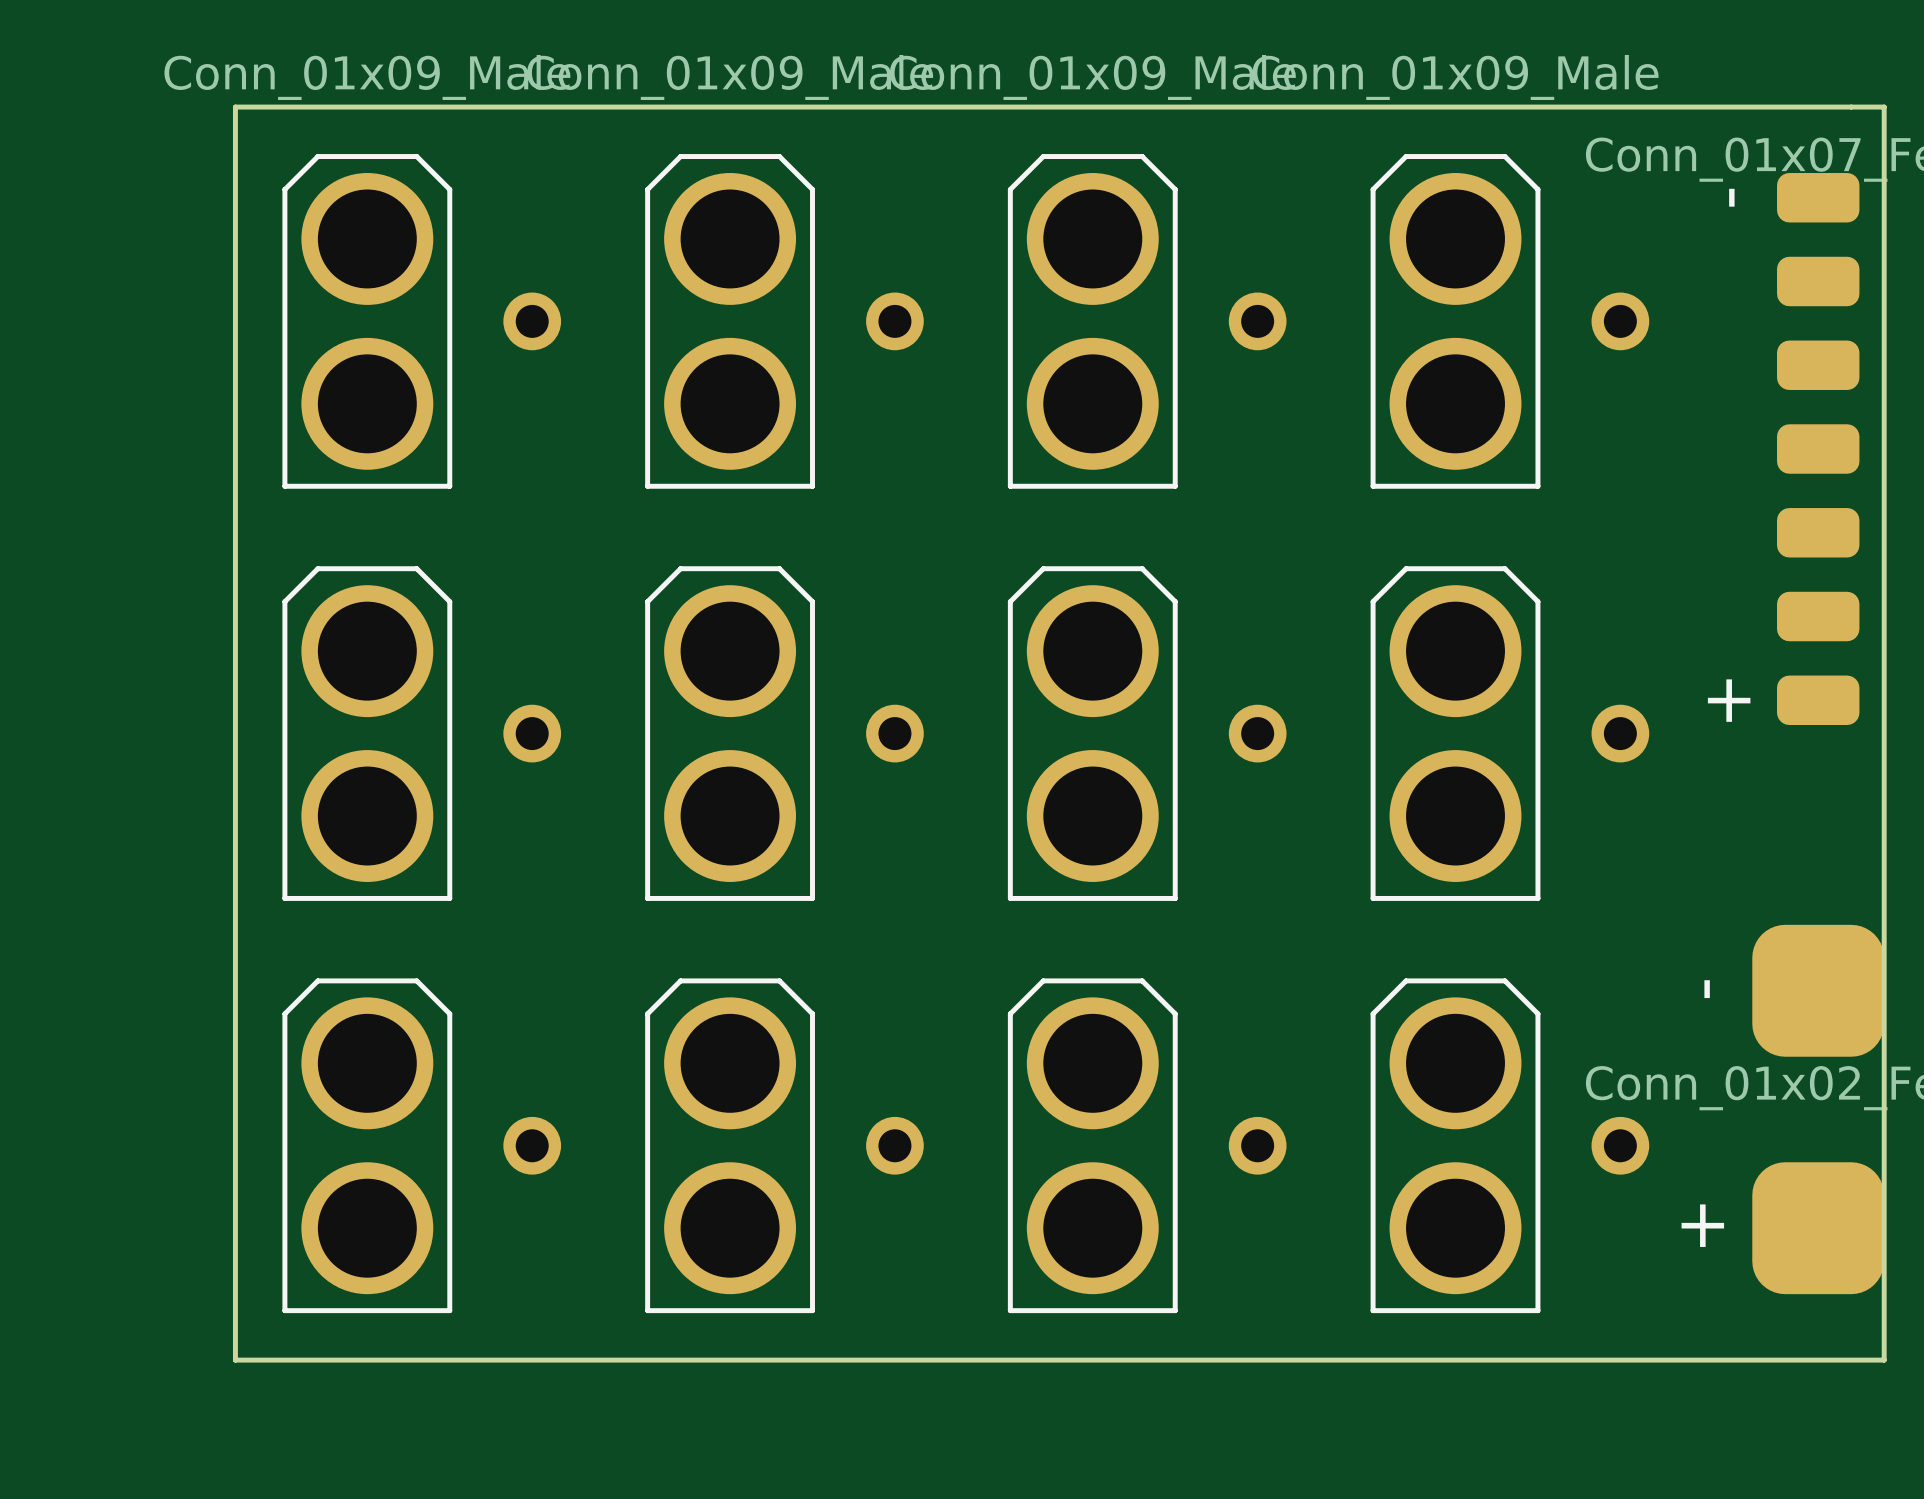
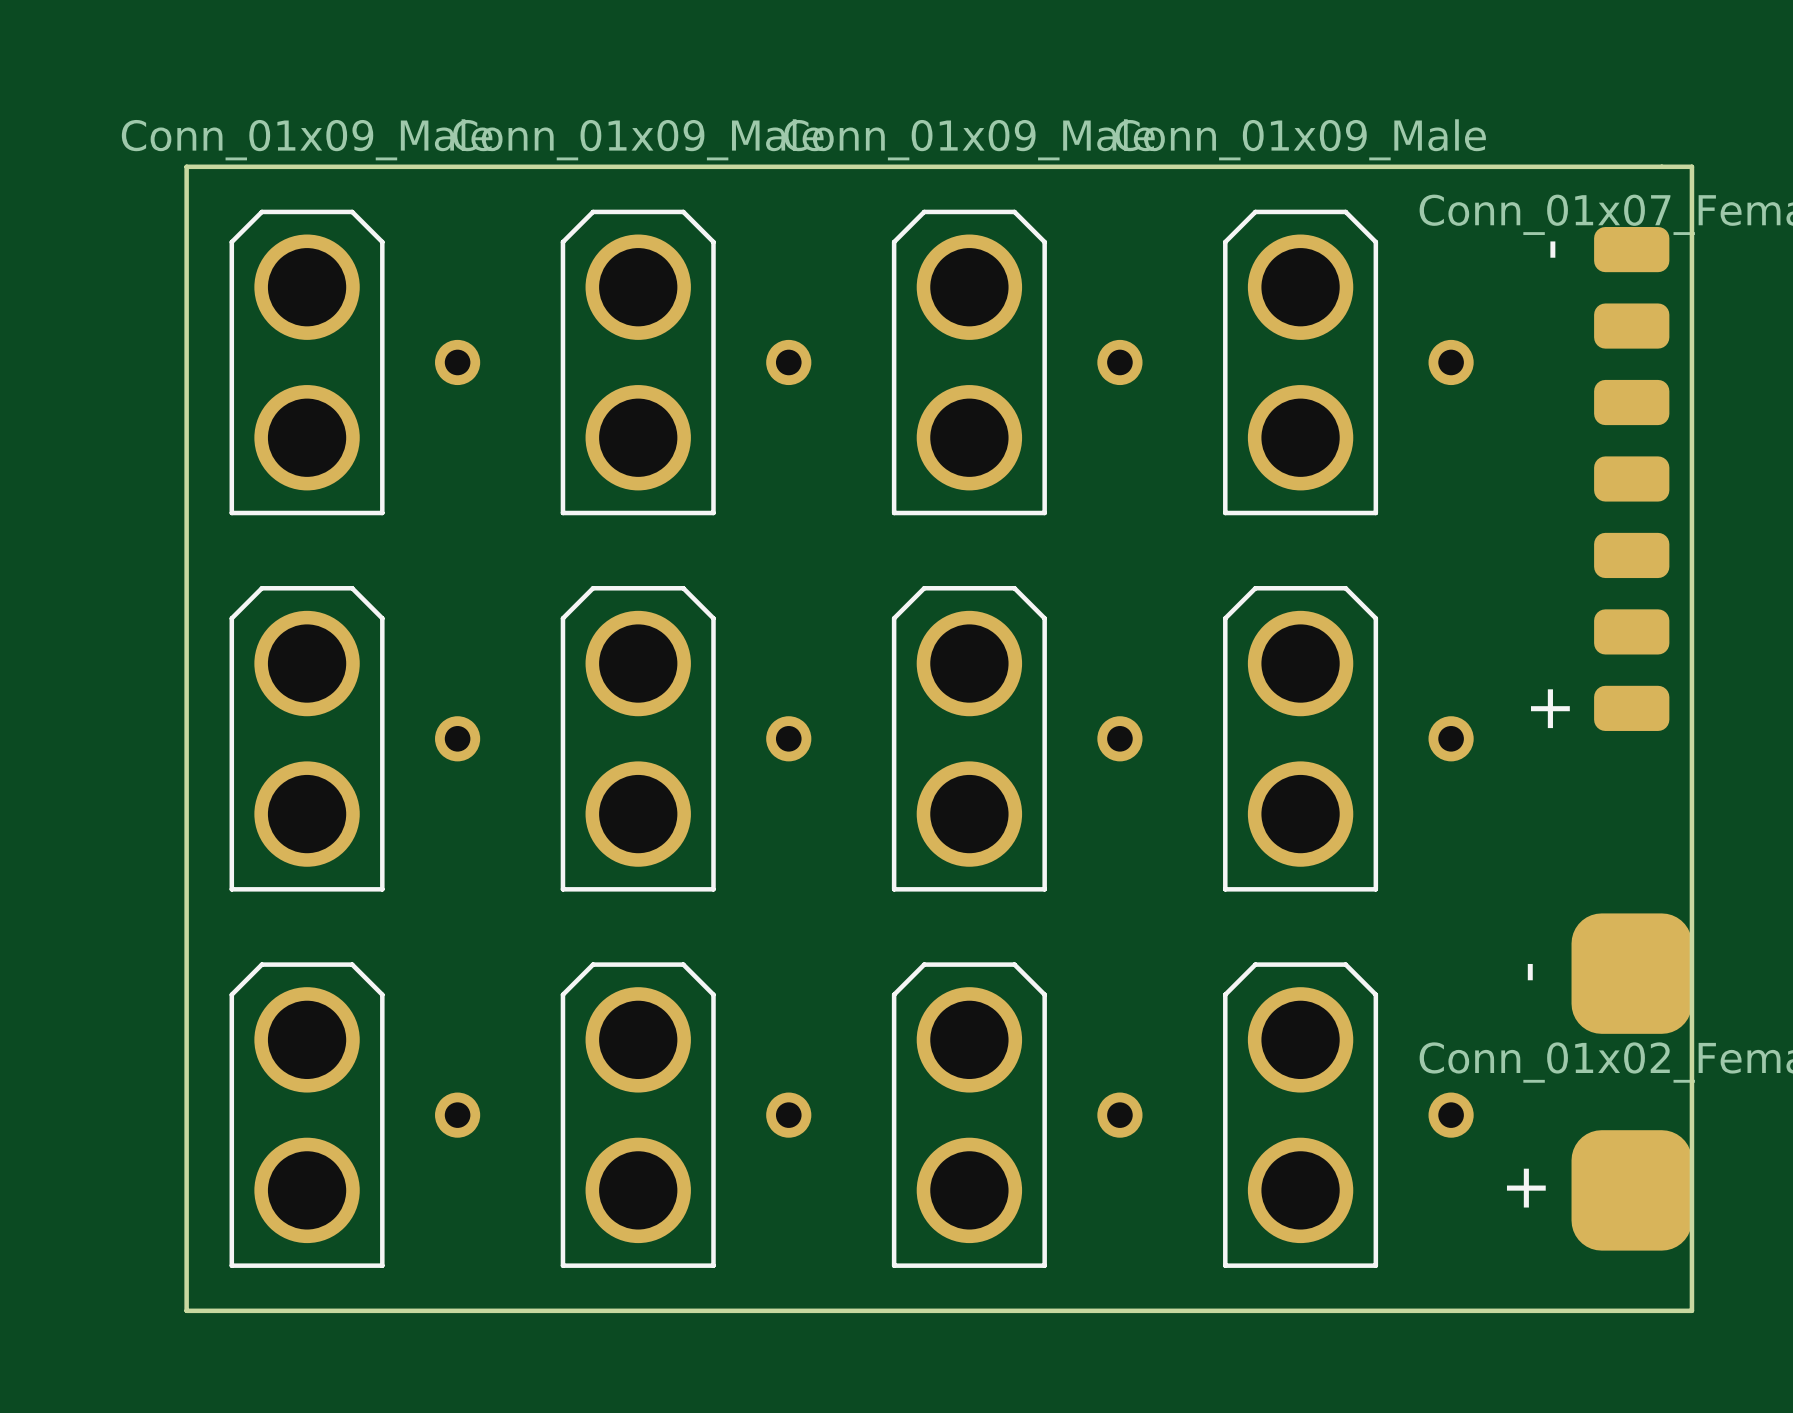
part footprint: [282, 154, 562, 1314] -> [229, 209, 481, 1268]
part footprint: [645, 154, 924, 1314] -> [560, 209, 812, 1268]
part footprint: [1007, 154, 1287, 1314] -> [891, 209, 1143, 1268]
part footprint: [1370, 154, 1650, 1314] -> [1223, 209, 1474, 1268]

